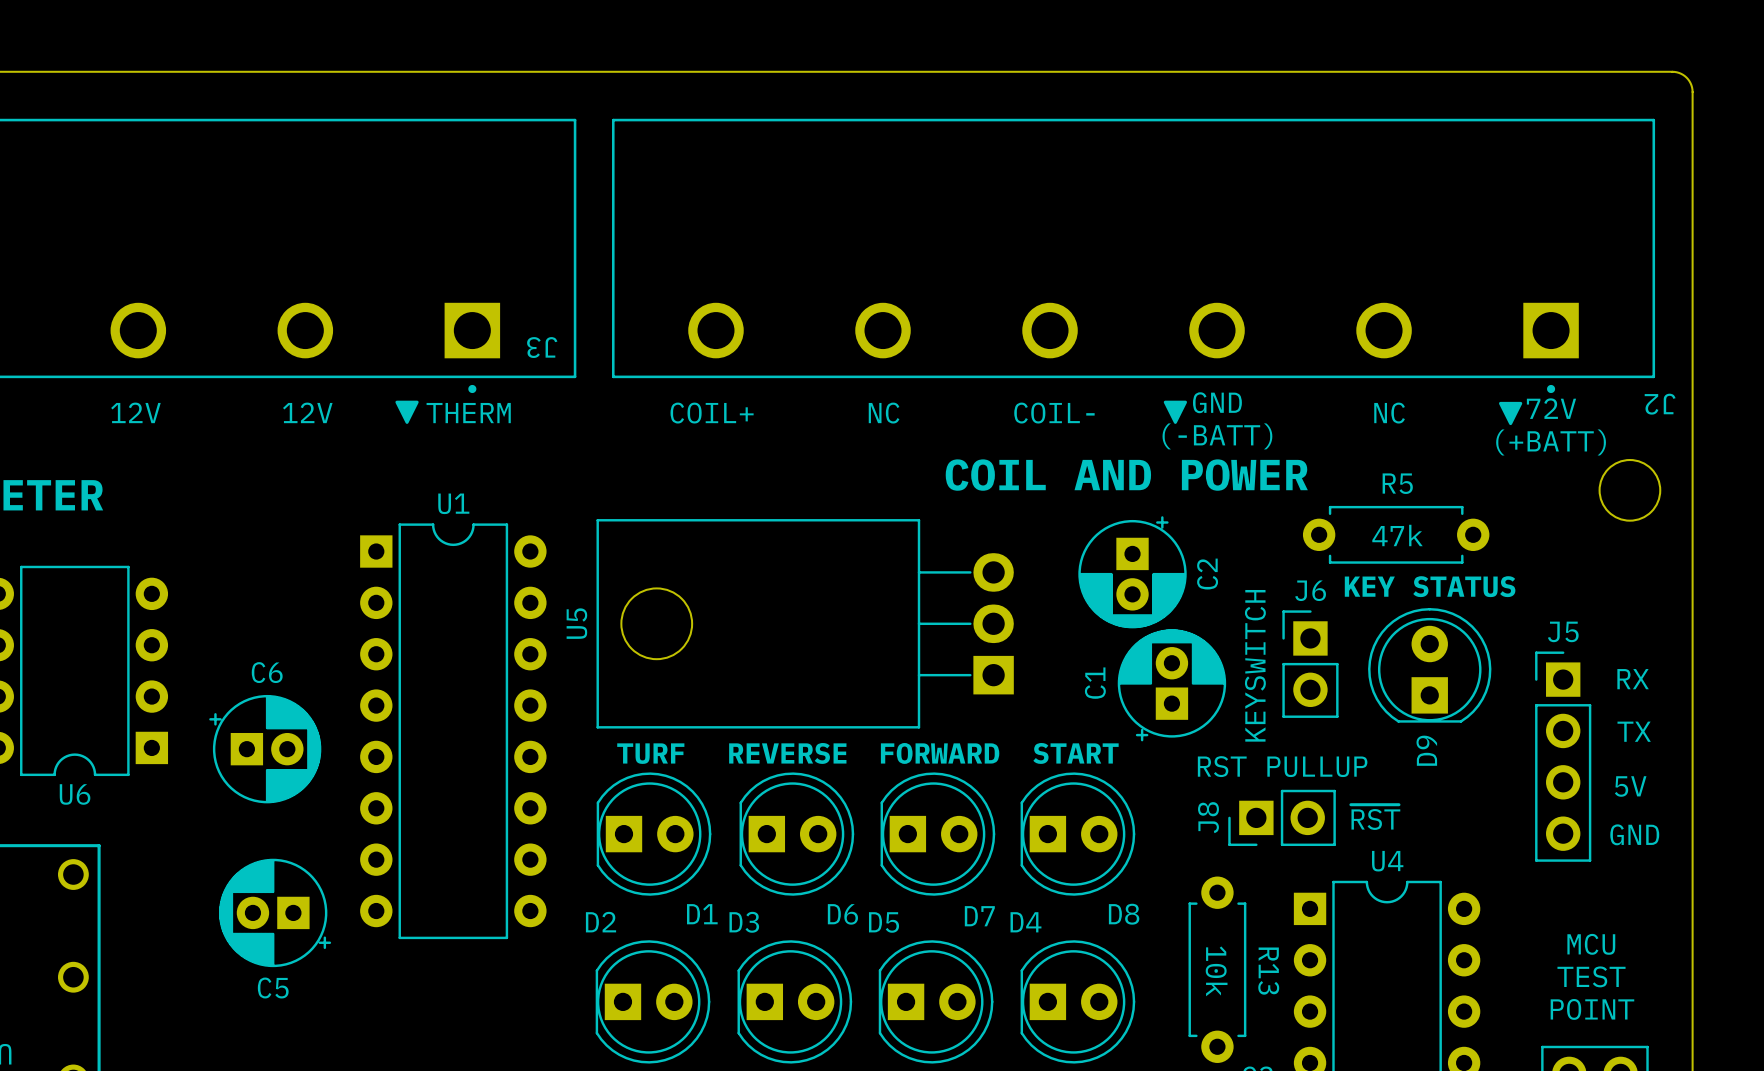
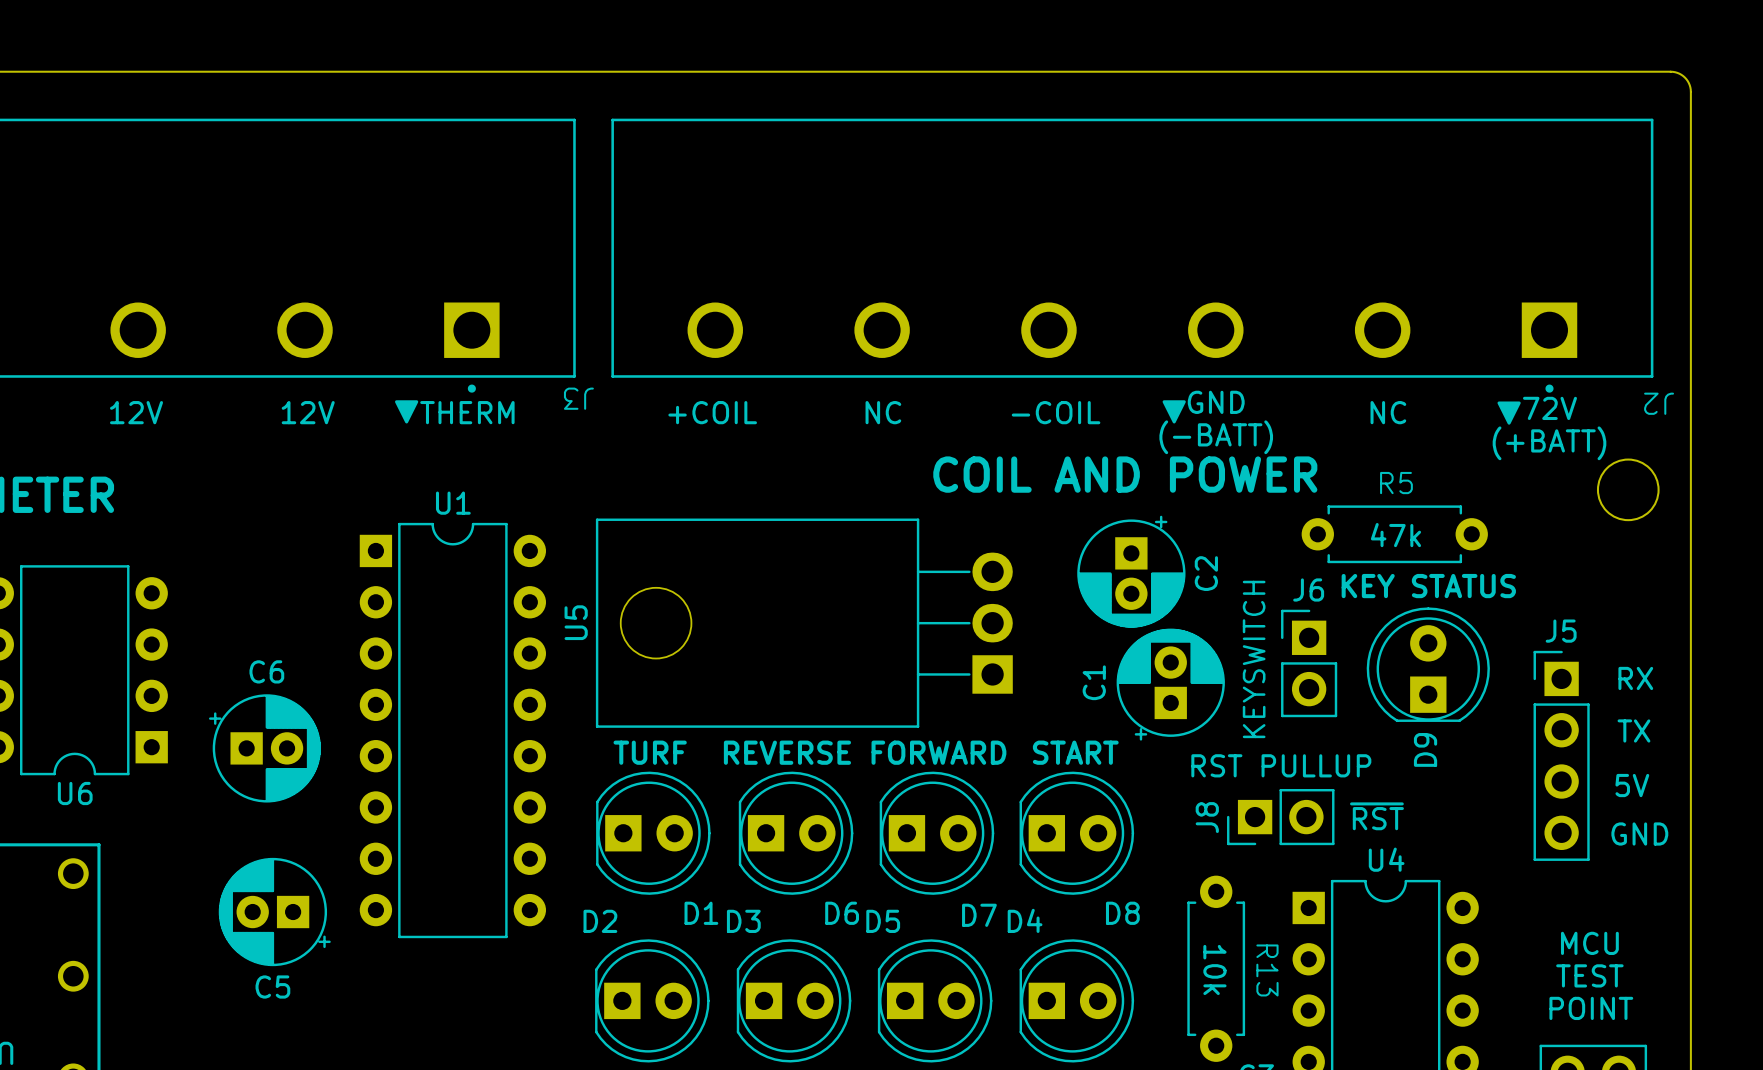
J3 name position: J3 (542, 347) -> J3 (578, 398)
text: COIL+ (712, 413) -> +COIL (712, 412)
text: COIL- (1054, 413) -> -COIL (1056, 412)

